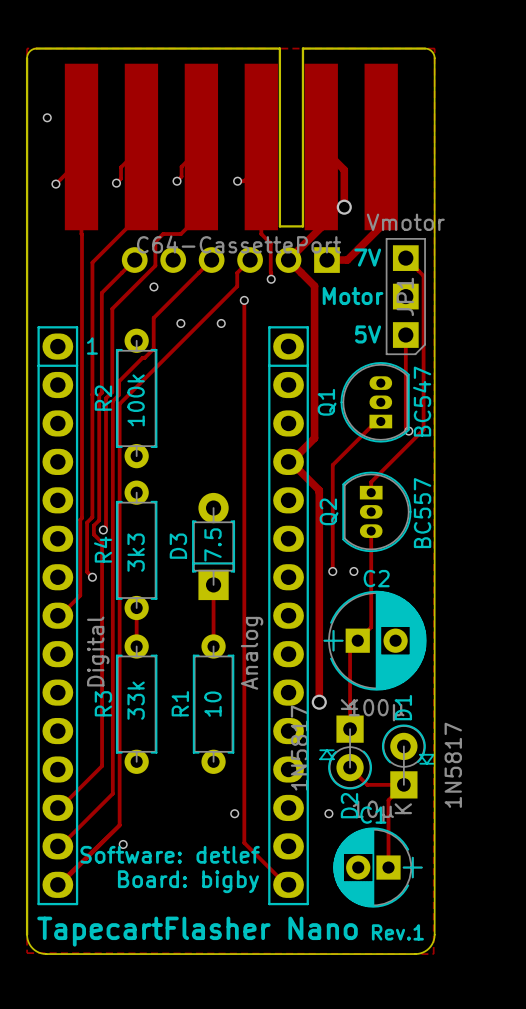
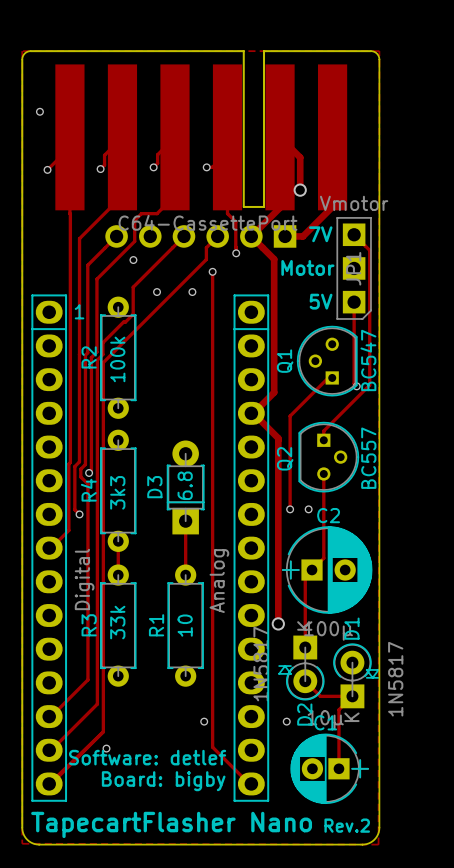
Q1 footprint: [340, 362, 410, 443] -> [296, 325, 358, 397]
Q2 footprint: [342, 471, 412, 553] -> [298, 421, 360, 493]
D3 value: 7.5 (213, 544) -> 6.8 (185, 485)
text: Rev.1 (397, 932) -> Rev.2 (347, 825)

